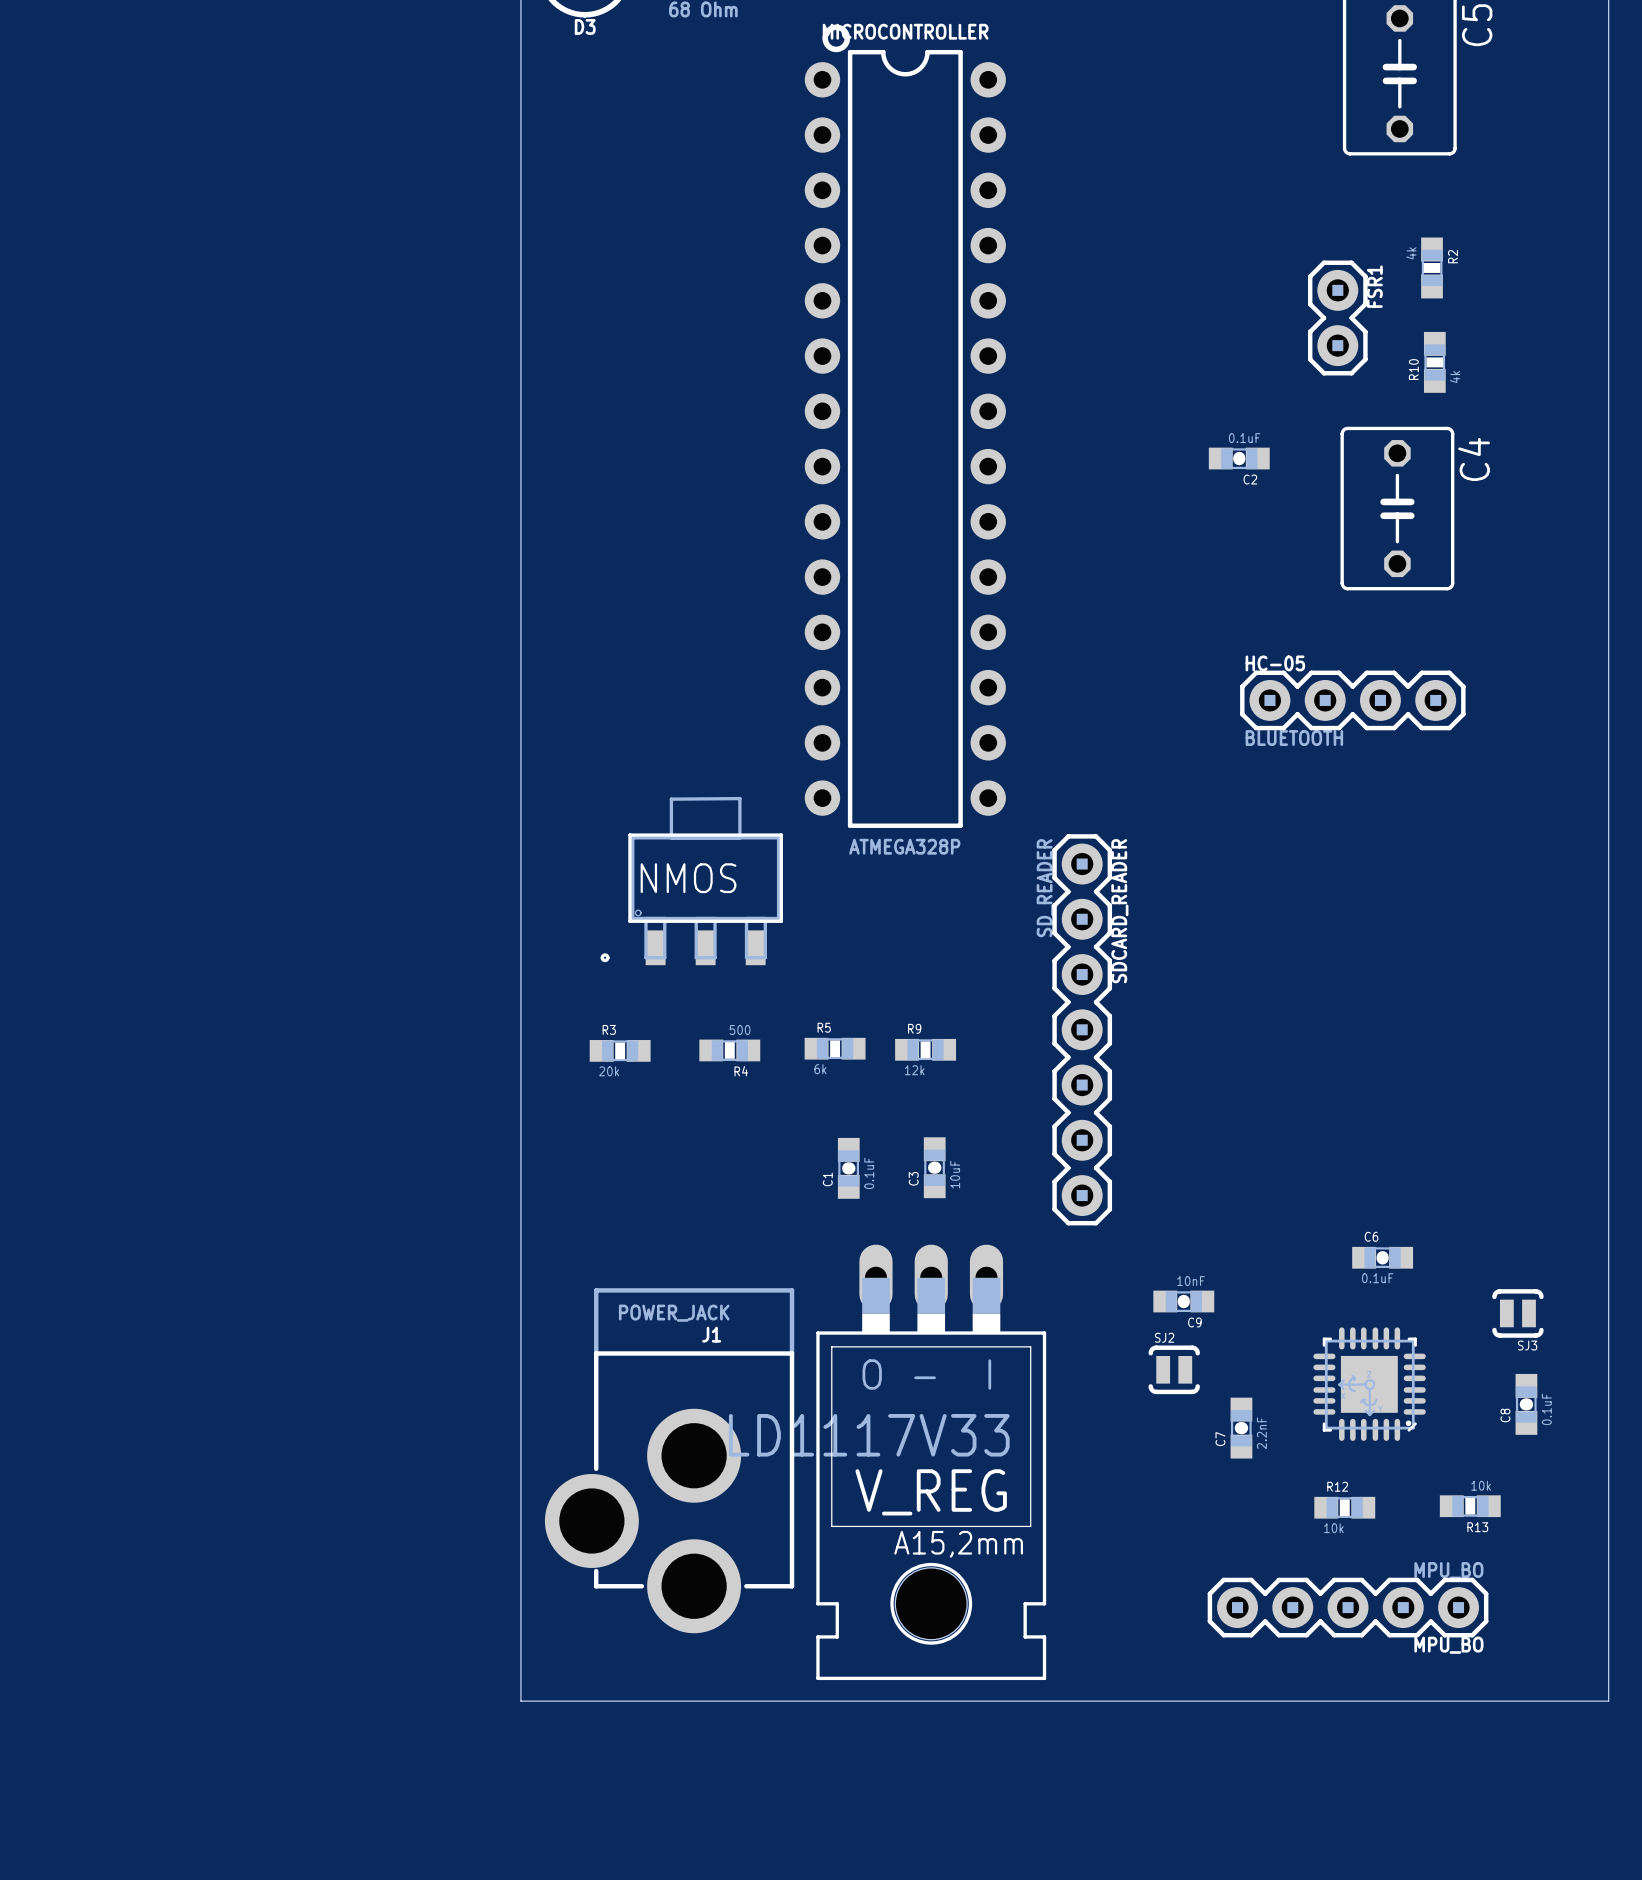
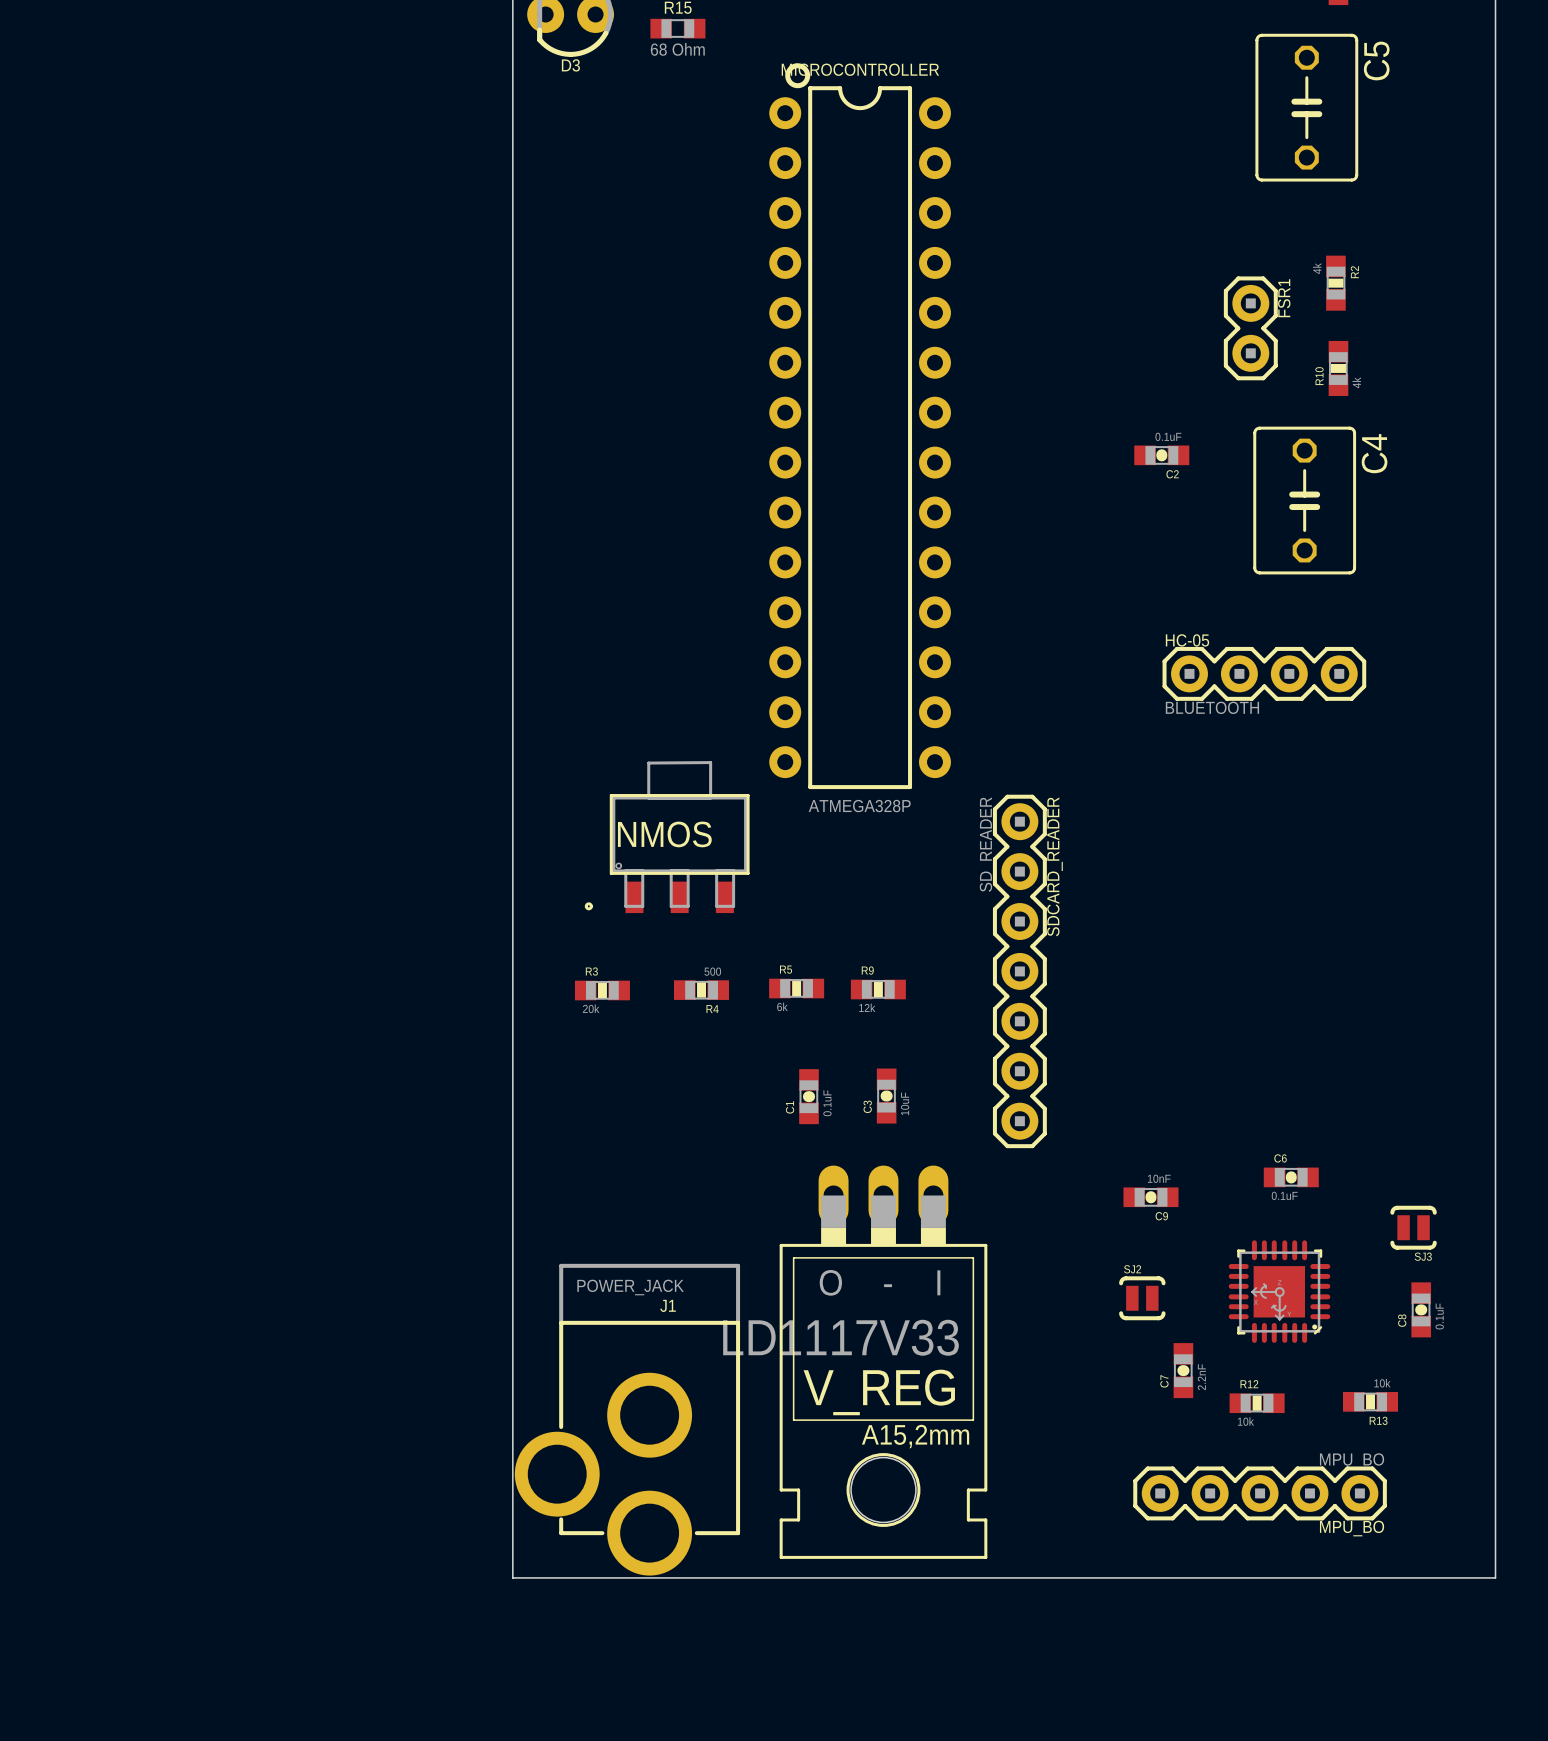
C9 position: (1183, 1301) -> (1150, 1197)
SJ2 position: (1174, 1369) -> (1142, 1298)
C7 position: (1241, 1428) -> (1183, 1370)
J1 position: (669, 1460) -> (627, 1419)

